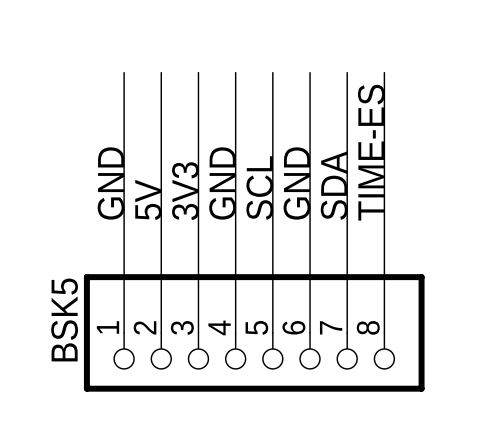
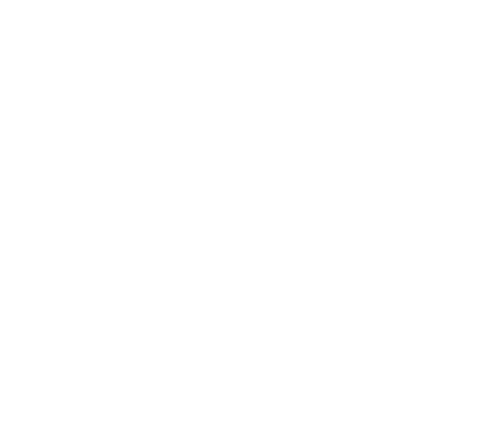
wire: (124, 72) (124, 332) -> none
wire: (161, 72) (161, 332) -> none
wire: (198, 72) (198, 332) -> none
wire: (235, 72) (235, 332) -> none
wire: (272, 72) (272, 332) -> none
wire: (310, 72) (310, 332) -> none
wire: (347, 72) (347, 332) -> none
wire: (384, 72) (384, 332) -> none
label: TIME-ES (371, 152) -> none
label: GND (111, 183) -> none
label: GND (222, 183) -> none
label: GND (297, 183) -> none
label: SDA (334, 185) -> none
label: SCL (259, 188) -> none
label: 3V3 (185, 191) -> none
label: 5V (148, 199) -> none
BSK5: (254, 332) -> none

